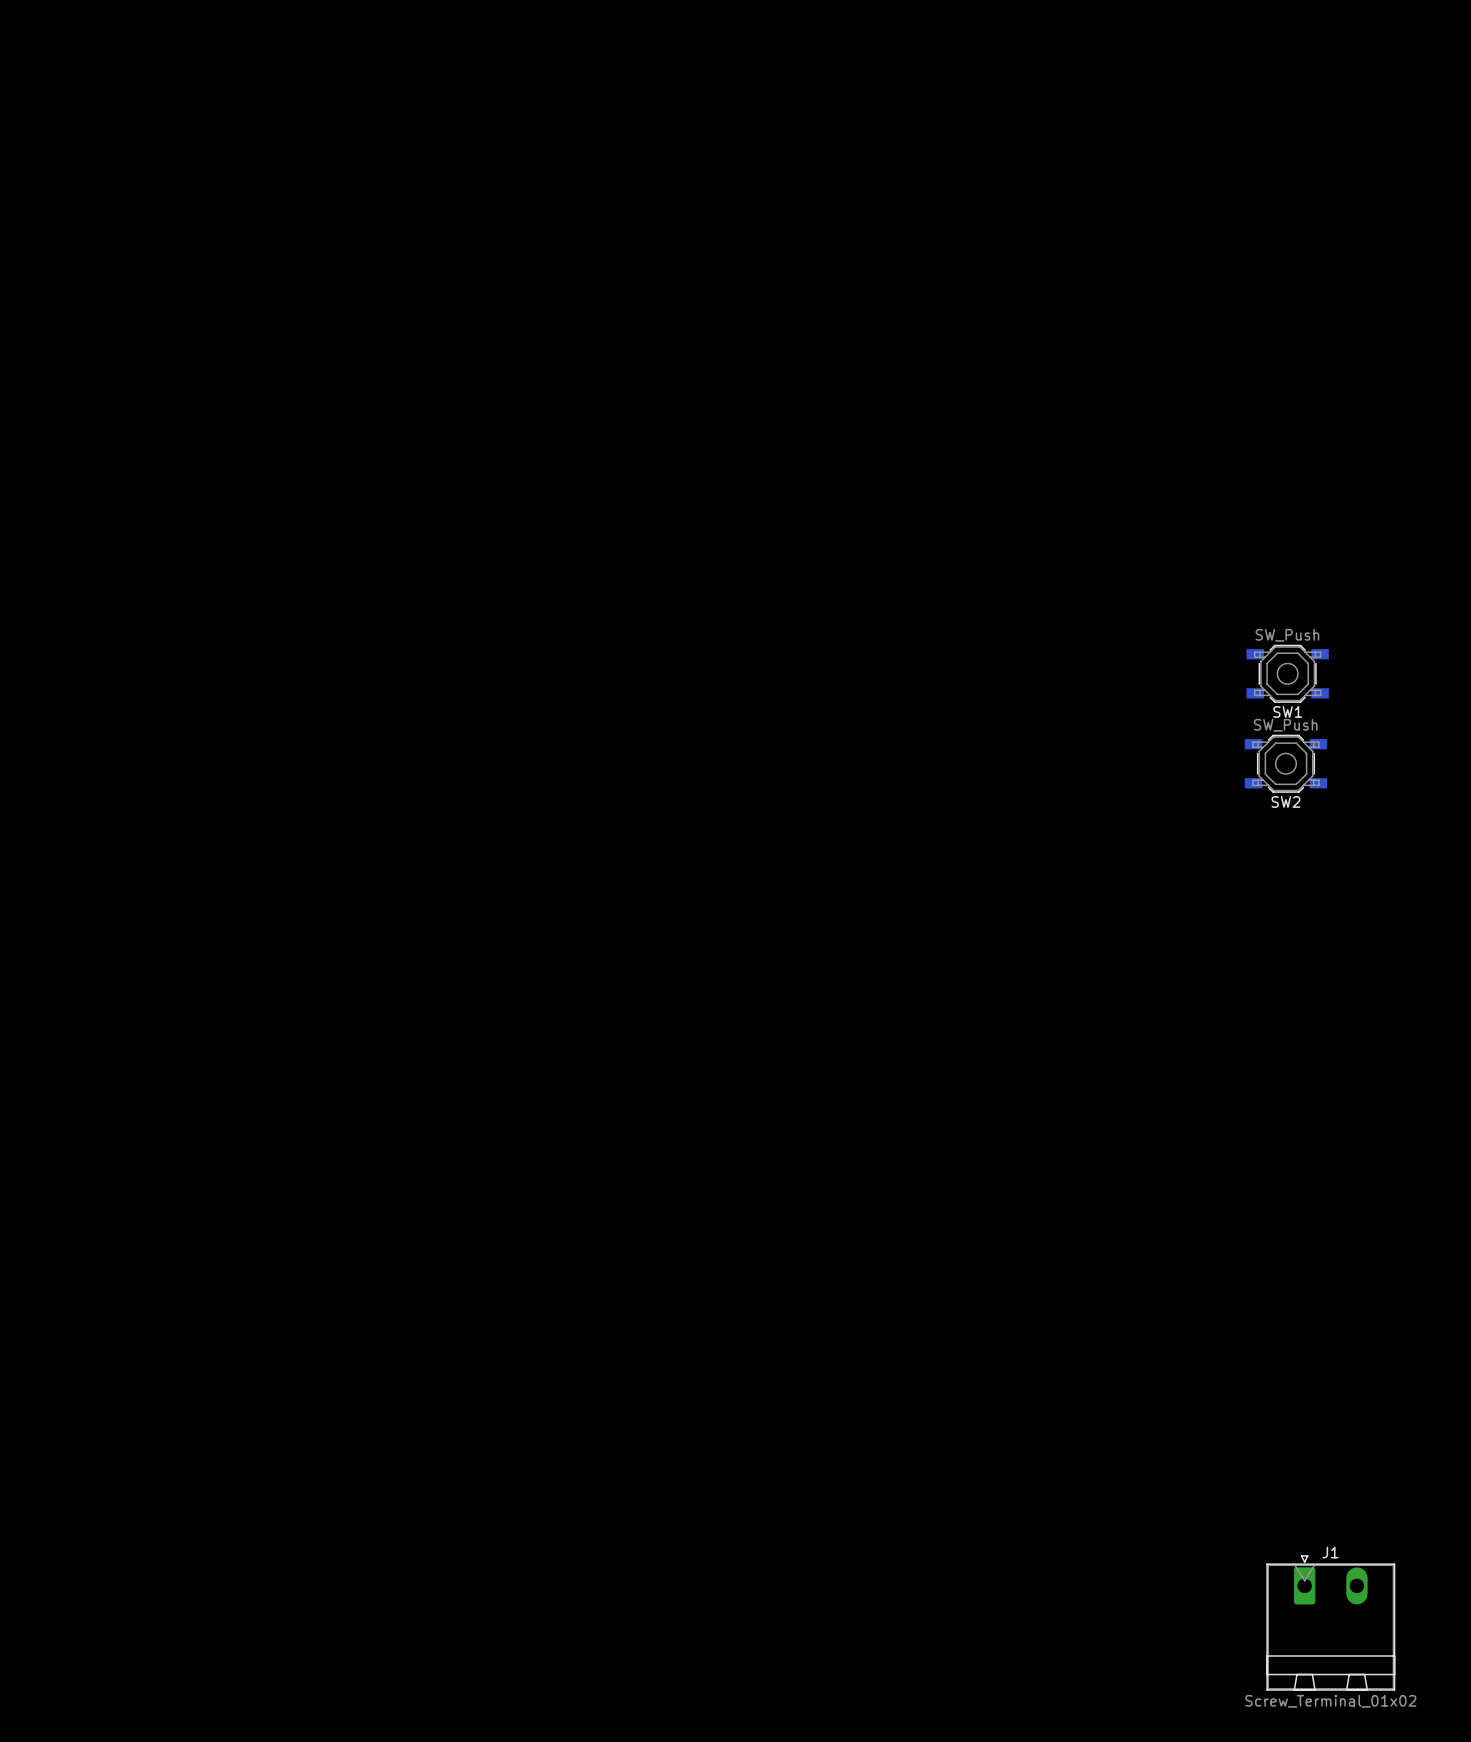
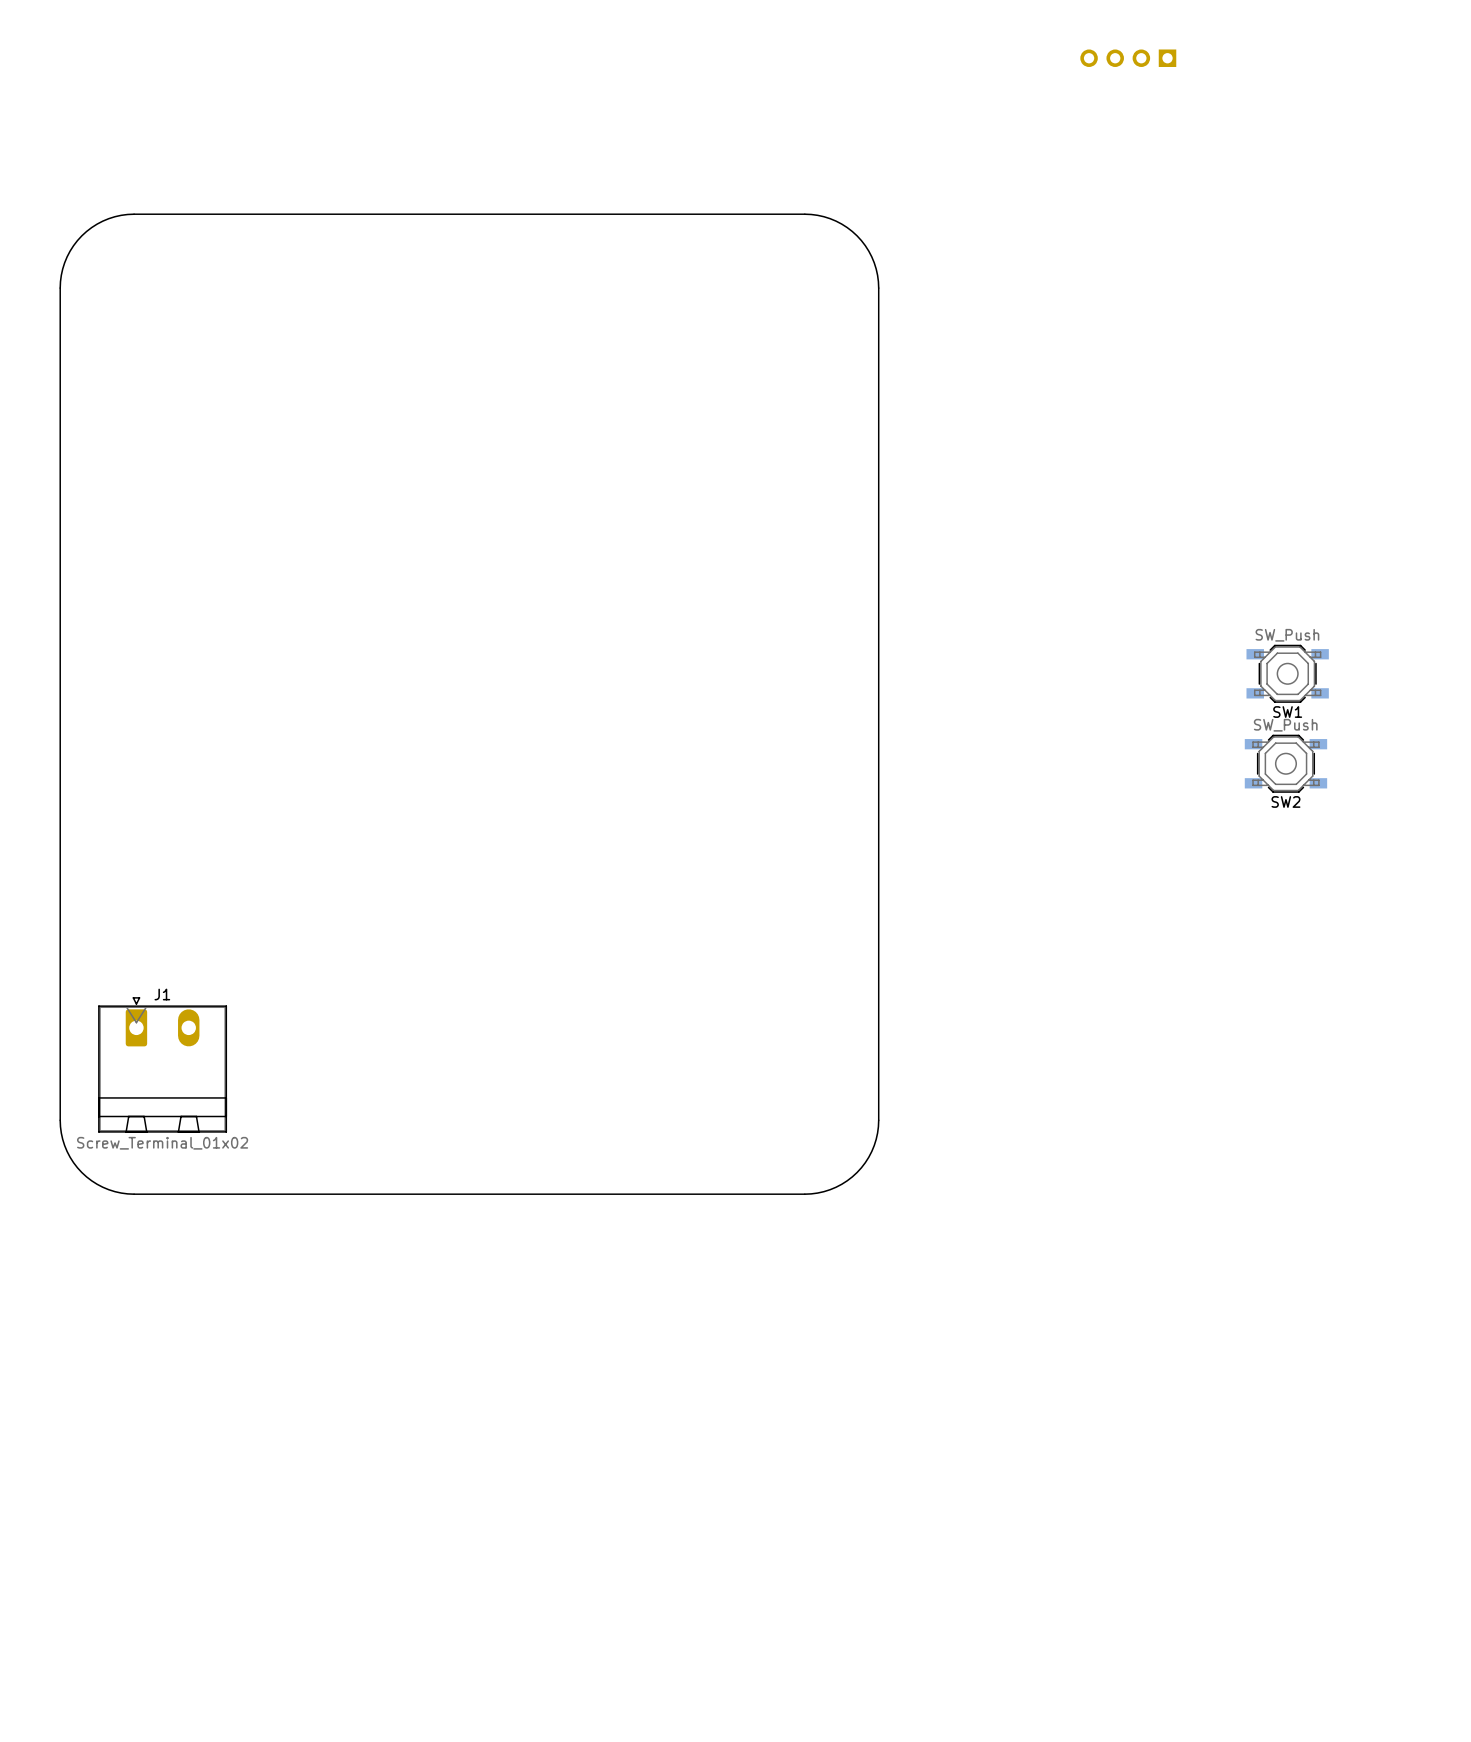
part: none -> (1128, 58)
board edge: none -> (804, 214) (134, 214) (114, 216) (97, 224) (81, 235) (73, 245) (62, 268) (60, 288) (60, 1120) (61, 1133) (67, 1151) (77, 1167) (91, 1180) (108, 1189) (134, 1194) (804, 1194) (823, 1191) (841, 1184) (857, 1172) (865, 1162) (876, 1139) (878, 1120) (878, 281) (871, 256) (861, 240) (852, 231) (830, 218) (804, 214)
J1 position: (1330, 1622) -> (162, 1064)

